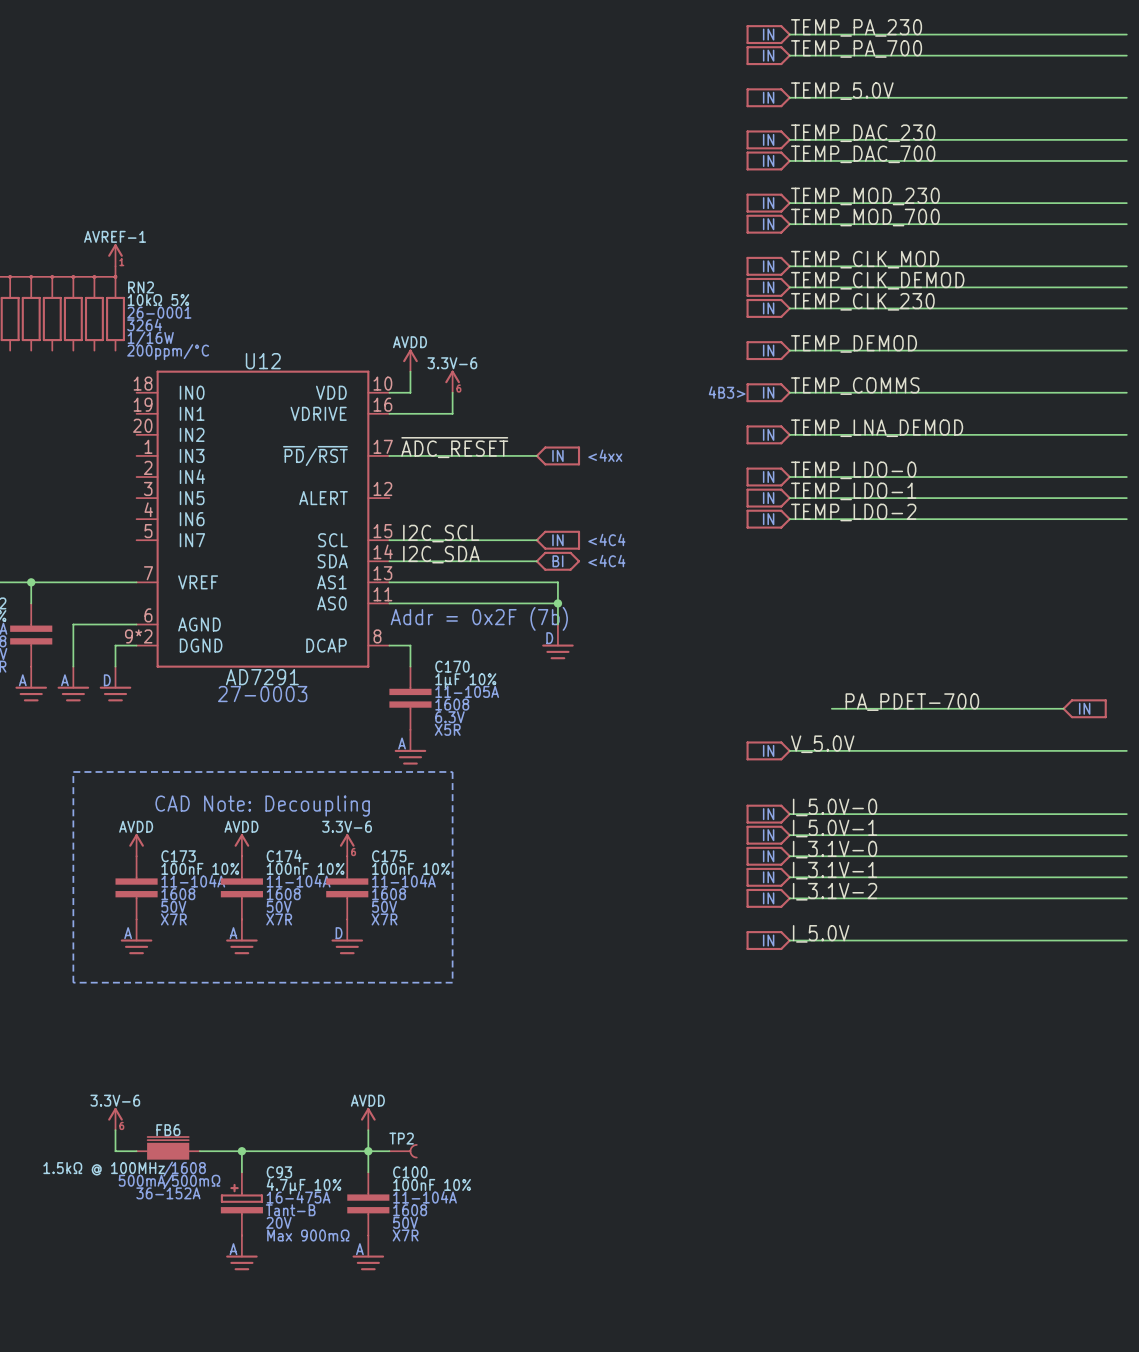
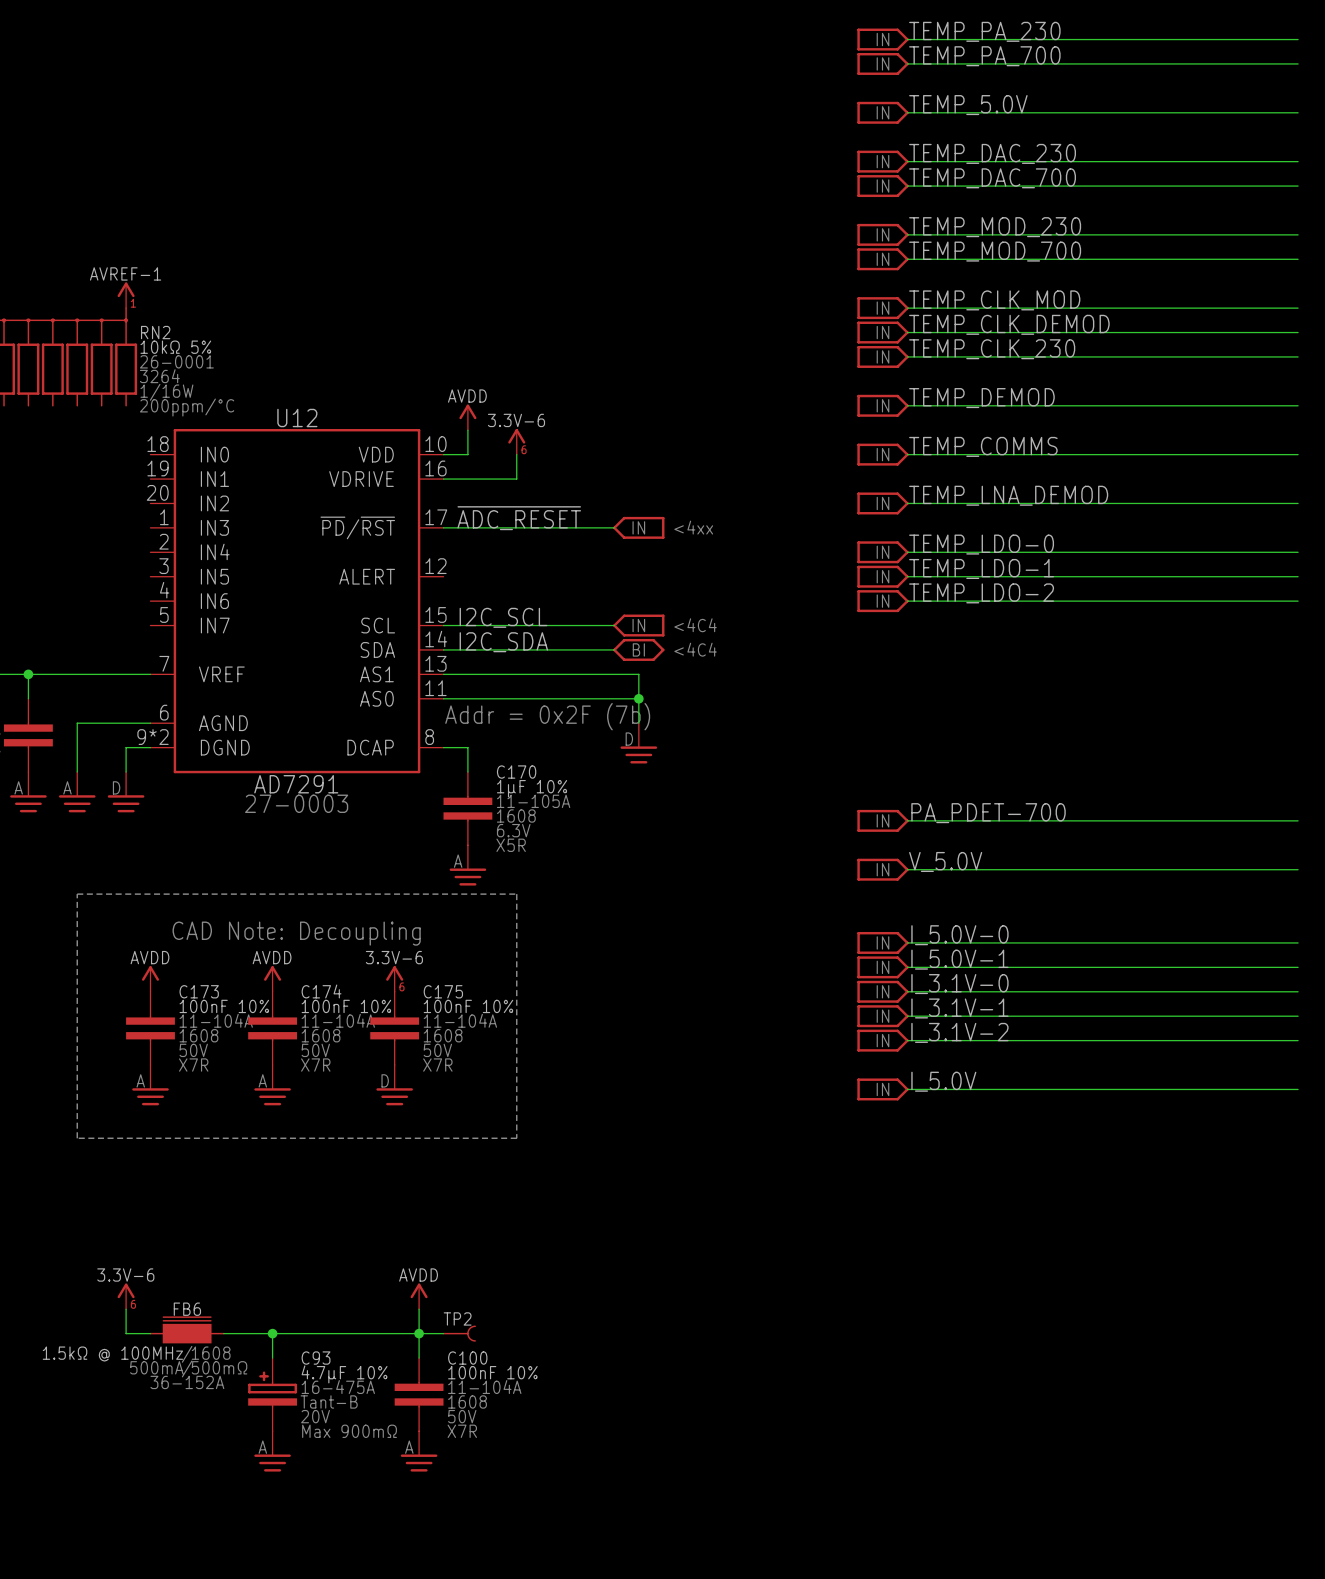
text: 4B3> (727, 392) -> none
label position: PA_PDET-700 (912, 702) -> PA_PDET-700 (988, 813)
part: none -> (882, 820)
wire: none -> (907, 820) (956, 820)
wire: none -> (1224, 820) (1298, 820)
part: (1084, 708) -> none

